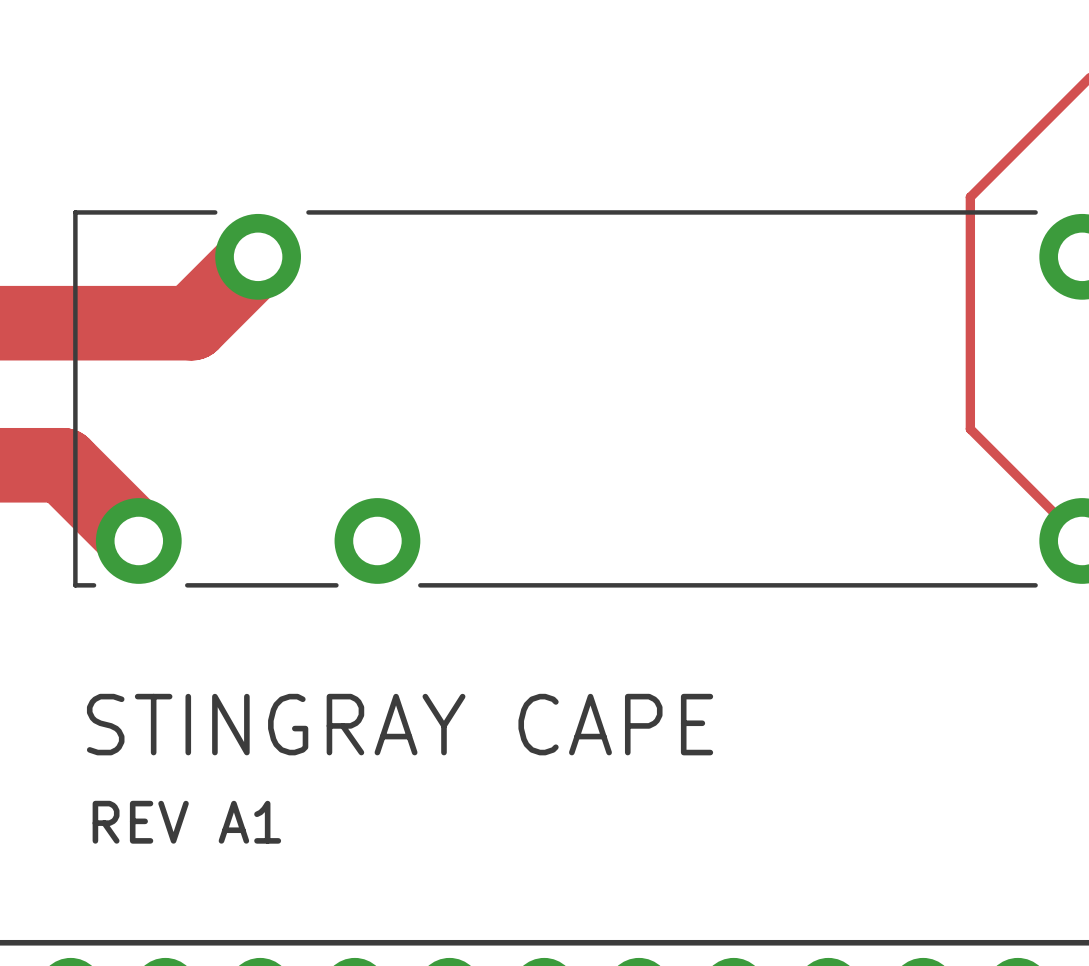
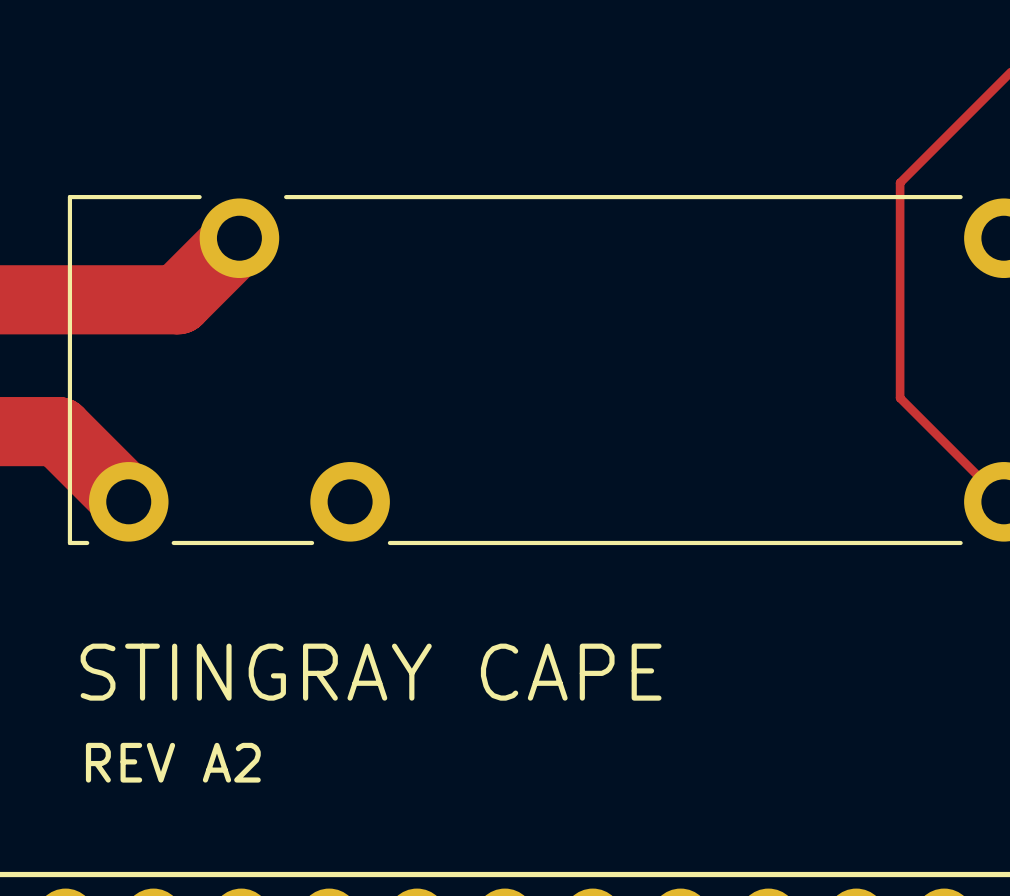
text: REV A1 (186, 822) -> REV A2 (173, 762)

